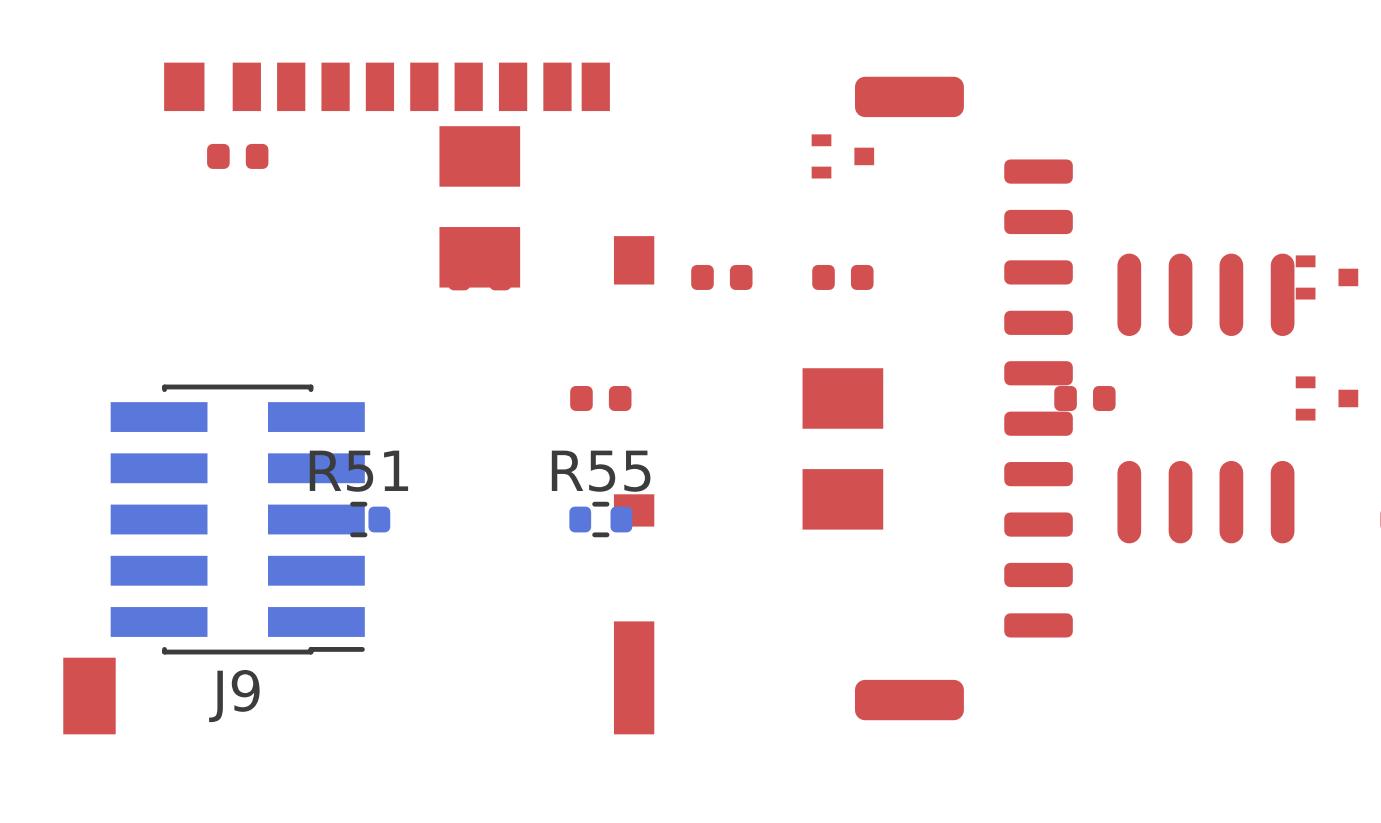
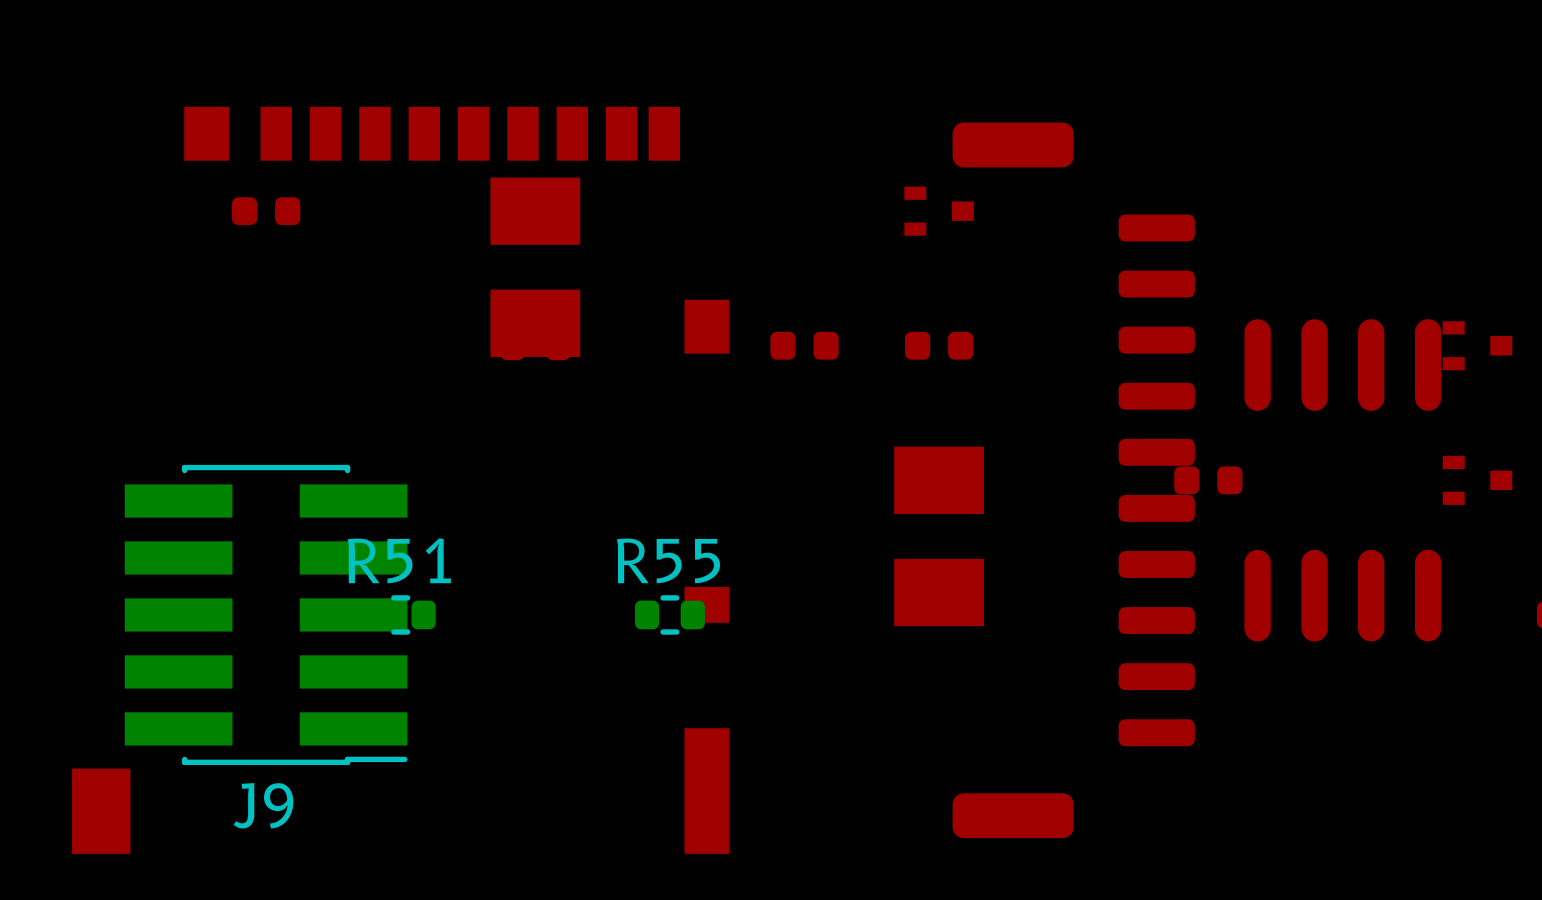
part: (600, 398) -> none

